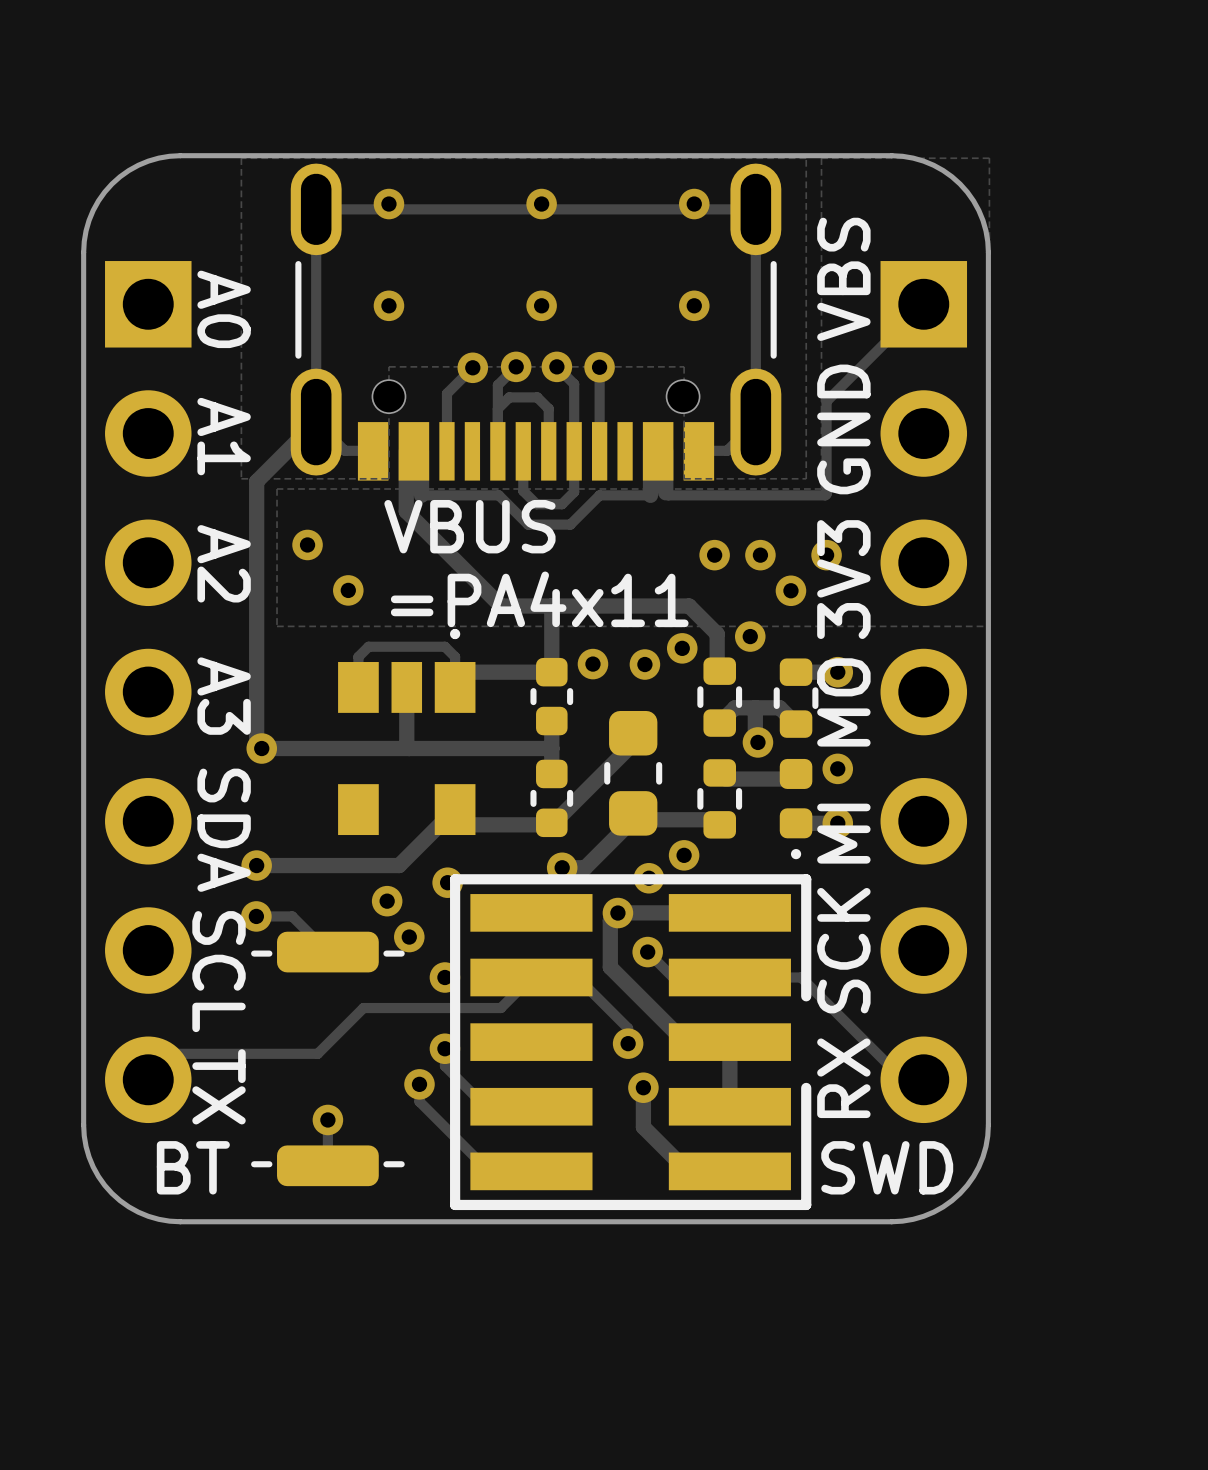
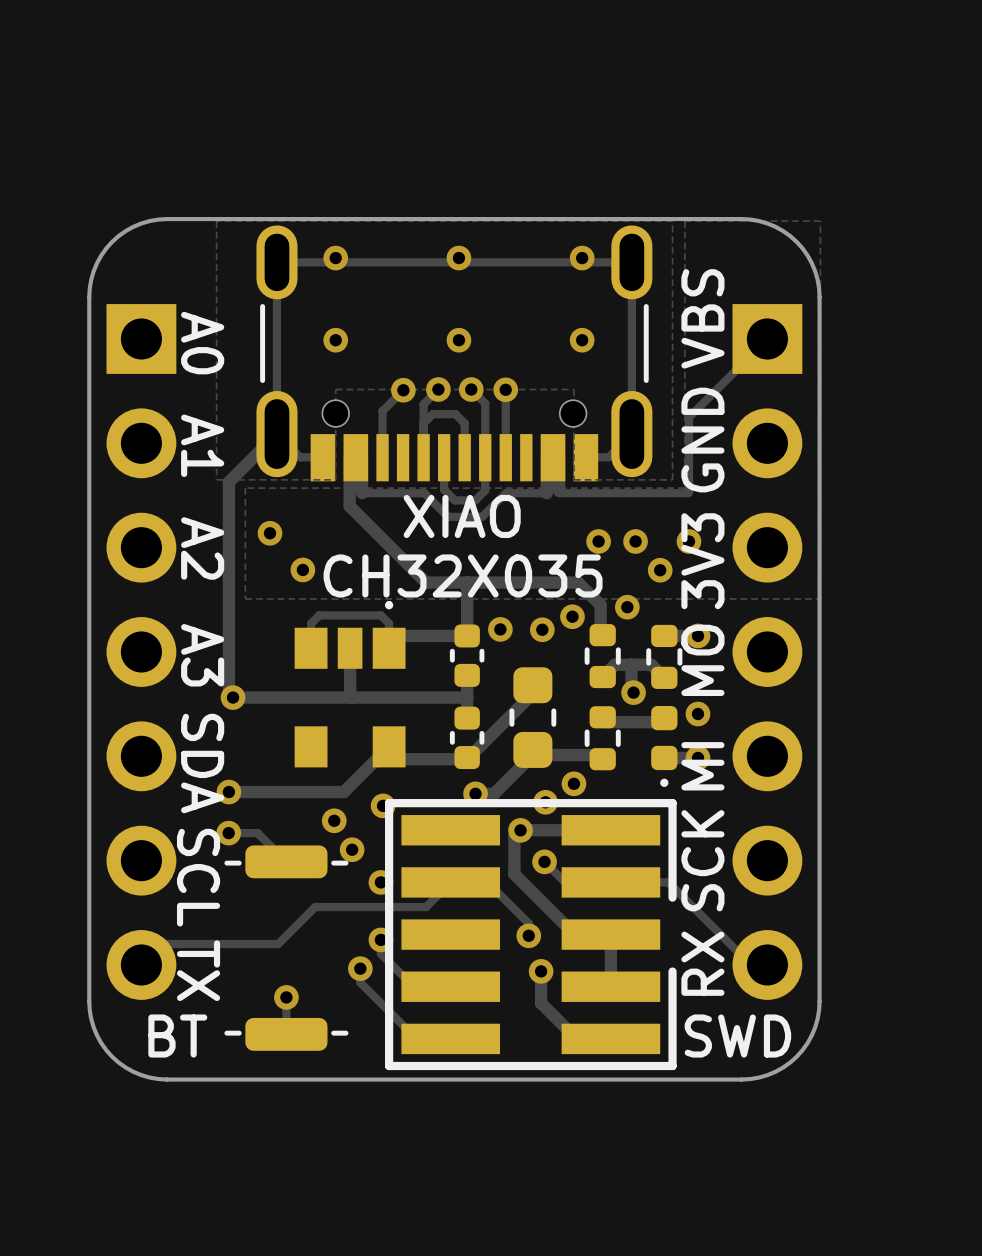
text: none -> XIAO (462, 516)
text: VBUS (469, 526) -> none
text: none -> CH32X035 (463, 575)
text: =PA4x11 (539, 599) -> none

